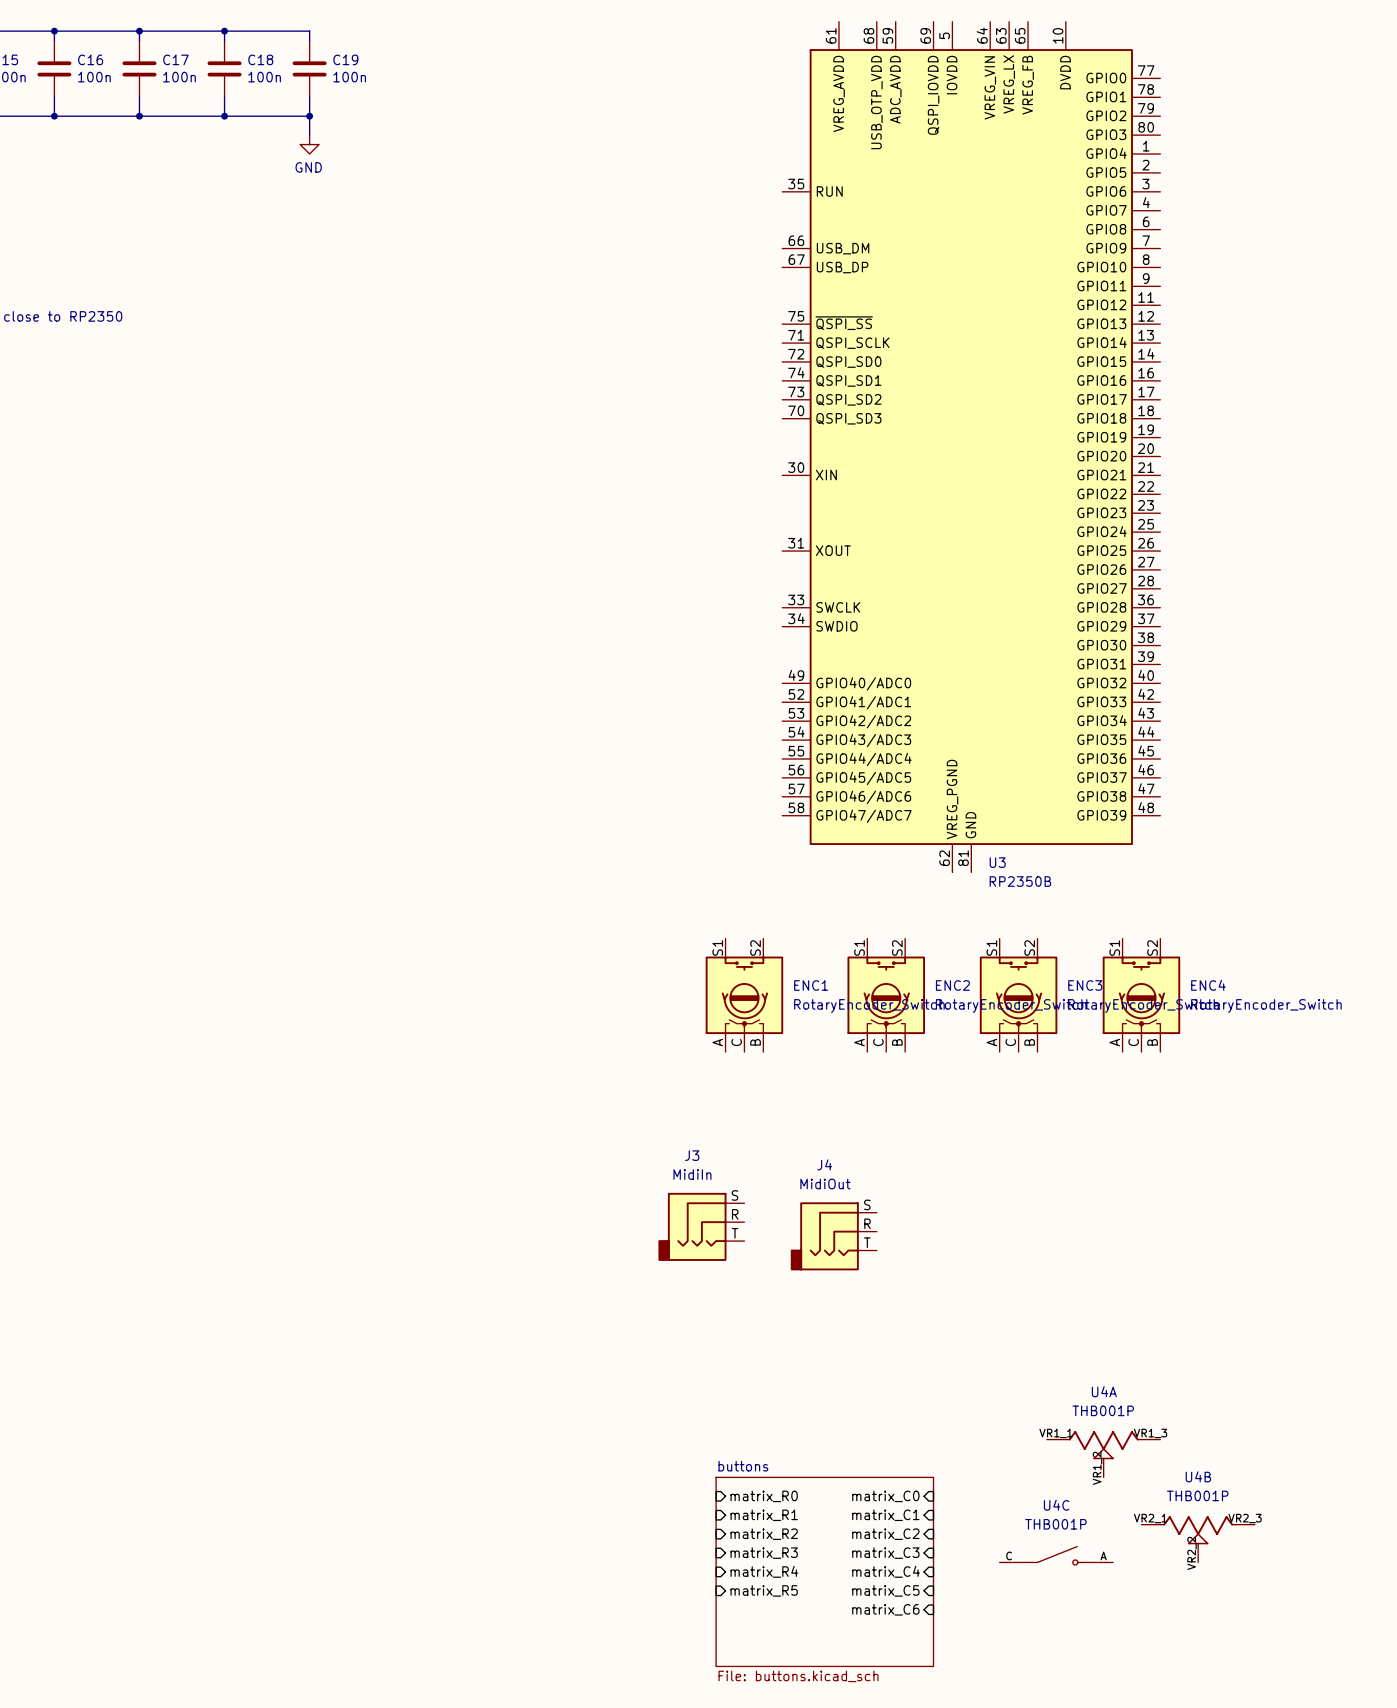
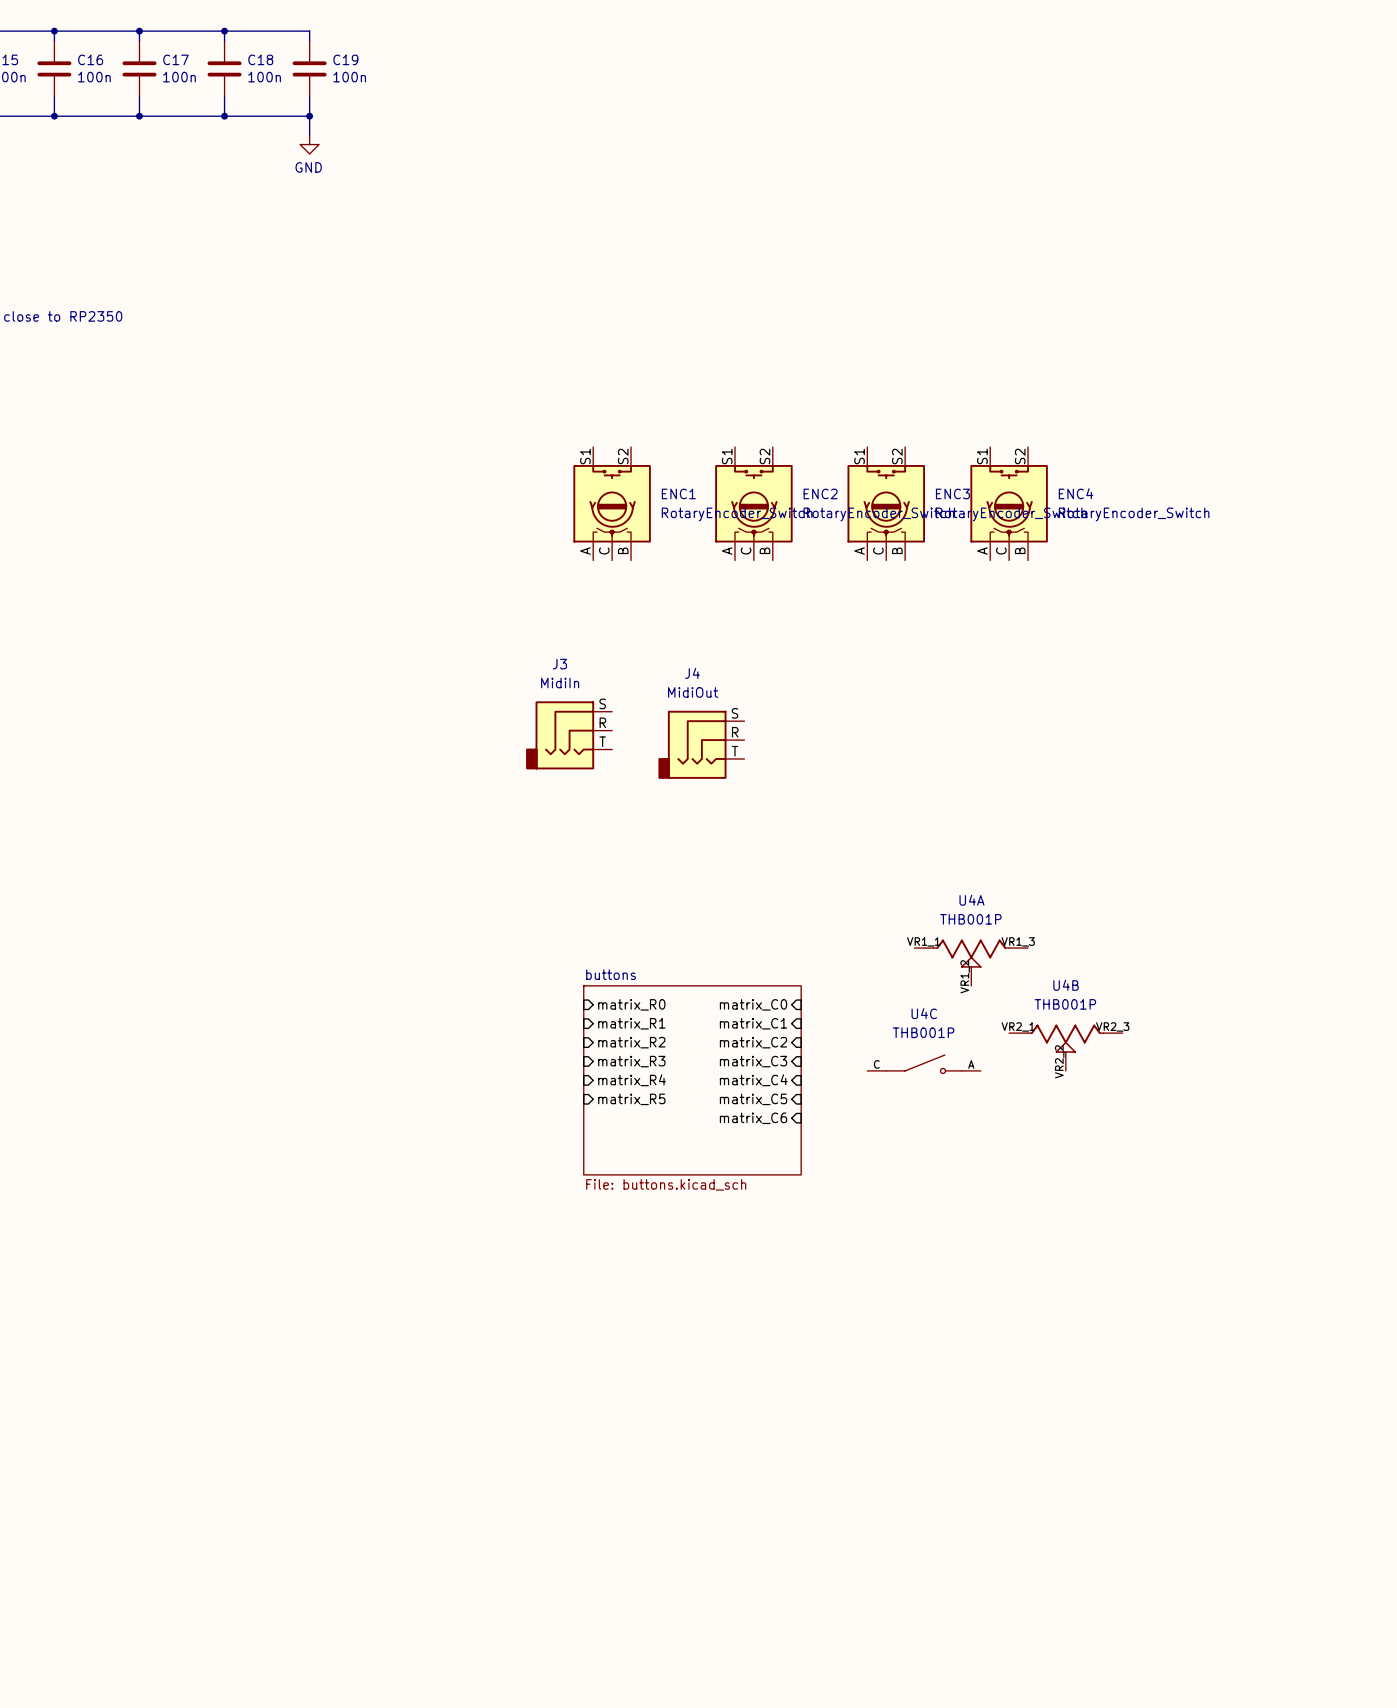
U3: RP2350B (971, 447) -> none
ENC1 position: (744, 995) -> (612, 503)
ENC2 position: (886, 995) -> (753, 503)
ENC3 position: (1018, 995) -> (886, 503)
ENC4 position: (1141, 995) -> (1009, 503)
sheet pin: none -> matrix_R0 (631, 1004)
sheet pin: none -> matrix_C0 (753, 1004)
sheet pin: none -> matrix_R1 (631, 1023)
sheet pin: none -> matrix_C1 (753, 1023)
sheet pin: none -> matrix_R2 (631, 1042)
sheet pin: none -> matrix_C2 (753, 1042)
sheet pin: none -> matrix_R3 (631, 1061)
sheet pin: none -> matrix_C3 (753, 1061)
sheet pin: none -> matrix_R4 (632, 1080)
sheet buttons: none -> File: buttons.kicad_sch (692, 1080)
sheet pin: none -> matrix_C4 (753, 1080)
sheet pin: none -> matrix_R5 (631, 1099)
sheet pin: none -> matrix_C5 (753, 1099)
sheet pin: none -> matrix_C6 (753, 1118)
J3 position: (701, 1226) -> (569, 735)
J4 position: (833, 1236) -> (701, 744)
U4A position: (1103, 1454) -> (971, 962)
sheet pin: matrix_R0 (764, 1496) -> none
sheet pin: matrix_C0 (885, 1496) -> none
sheet pin: matrix_R1 (764, 1515) -> none
sheet pin: matrix_C1 (885, 1515) -> none
sheet pin: matrix_R2 (764, 1534) -> none
sheet pin: matrix_C2 (885, 1534) -> none
U4B position: (1198, 1539) -> (1065, 1047)
sheet pin: matrix_R3 (764, 1553) -> none
sheet pin: matrix_C3 (885, 1553) -> none
U4C position: (1056, 1555) -> (924, 1064)
sheet pin: matrix_R4 (764, 1571) -> none
sheet buttons: File: buttons.kicad_sch (824, 1571) -> none
sheet pin: matrix_C4 (886, 1571) -> none
sheet pin: matrix_R5 (764, 1590) -> none
sheet pin: matrix_C5 (885, 1590) -> none
sheet pin: matrix_C6 (885, 1609) -> none

